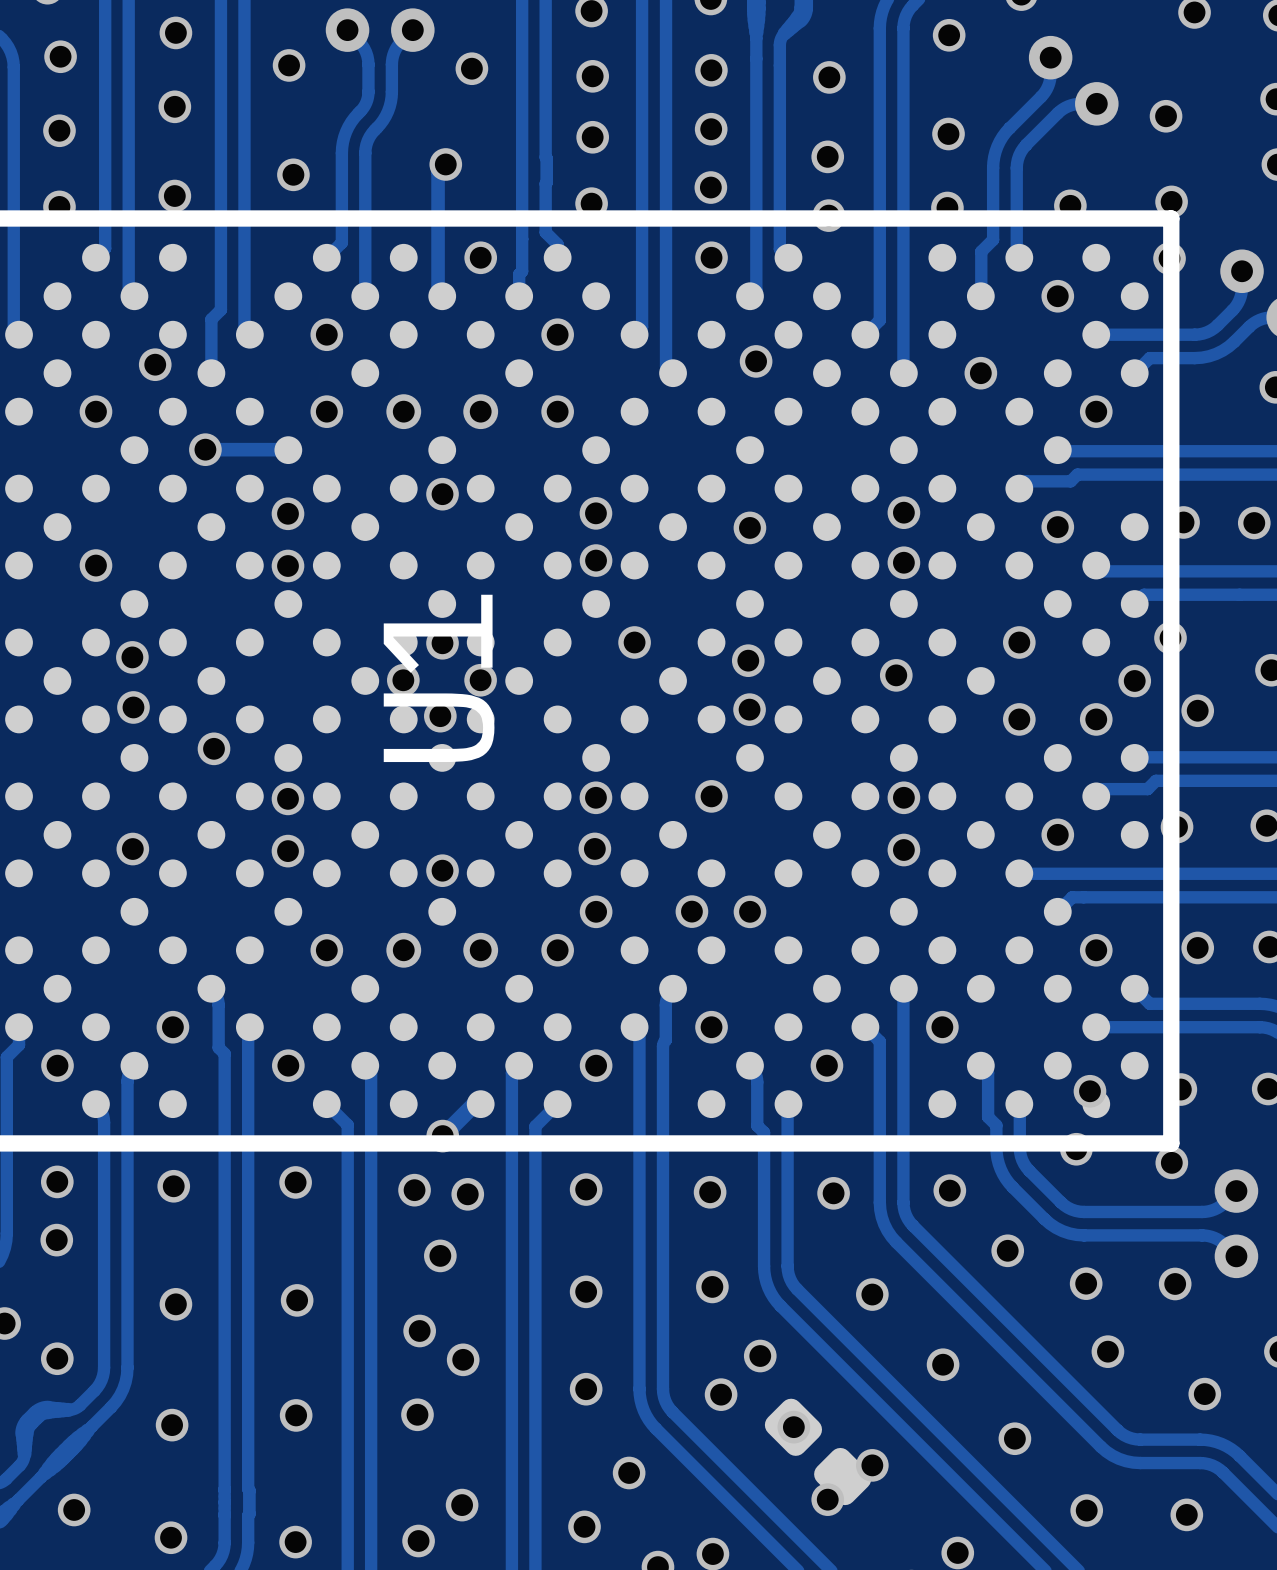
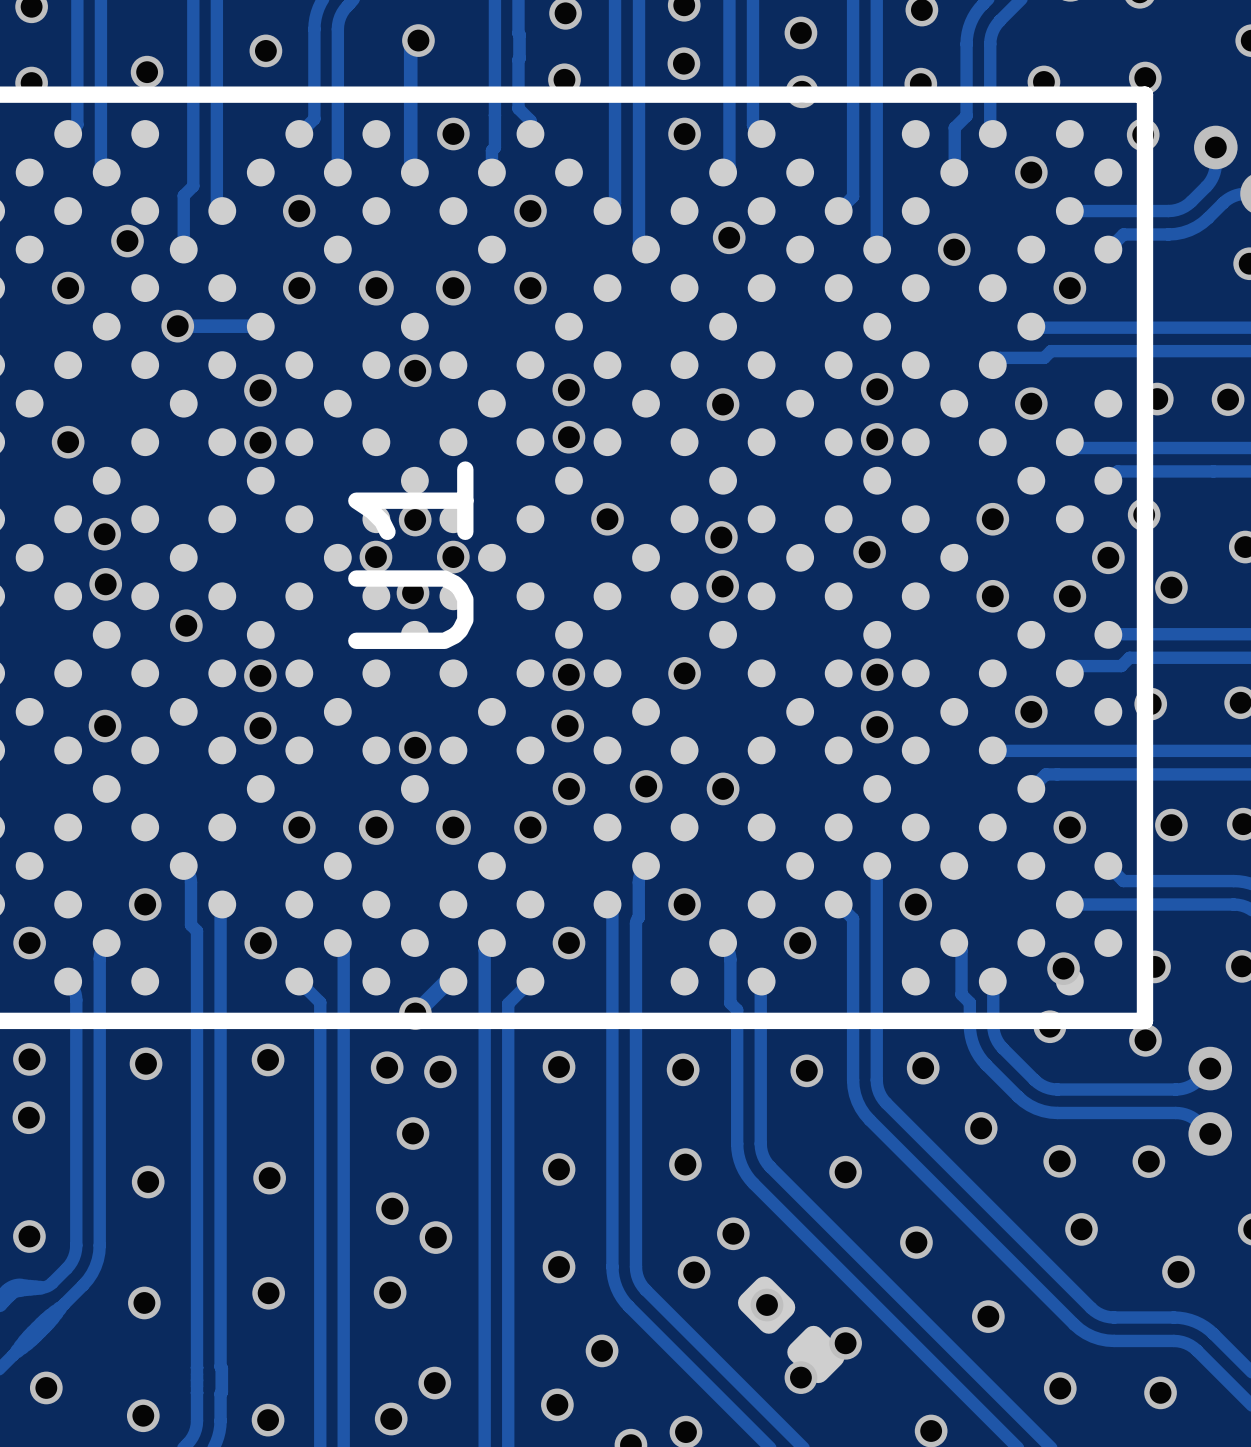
via position: (691, 911) -> (646, 786)

